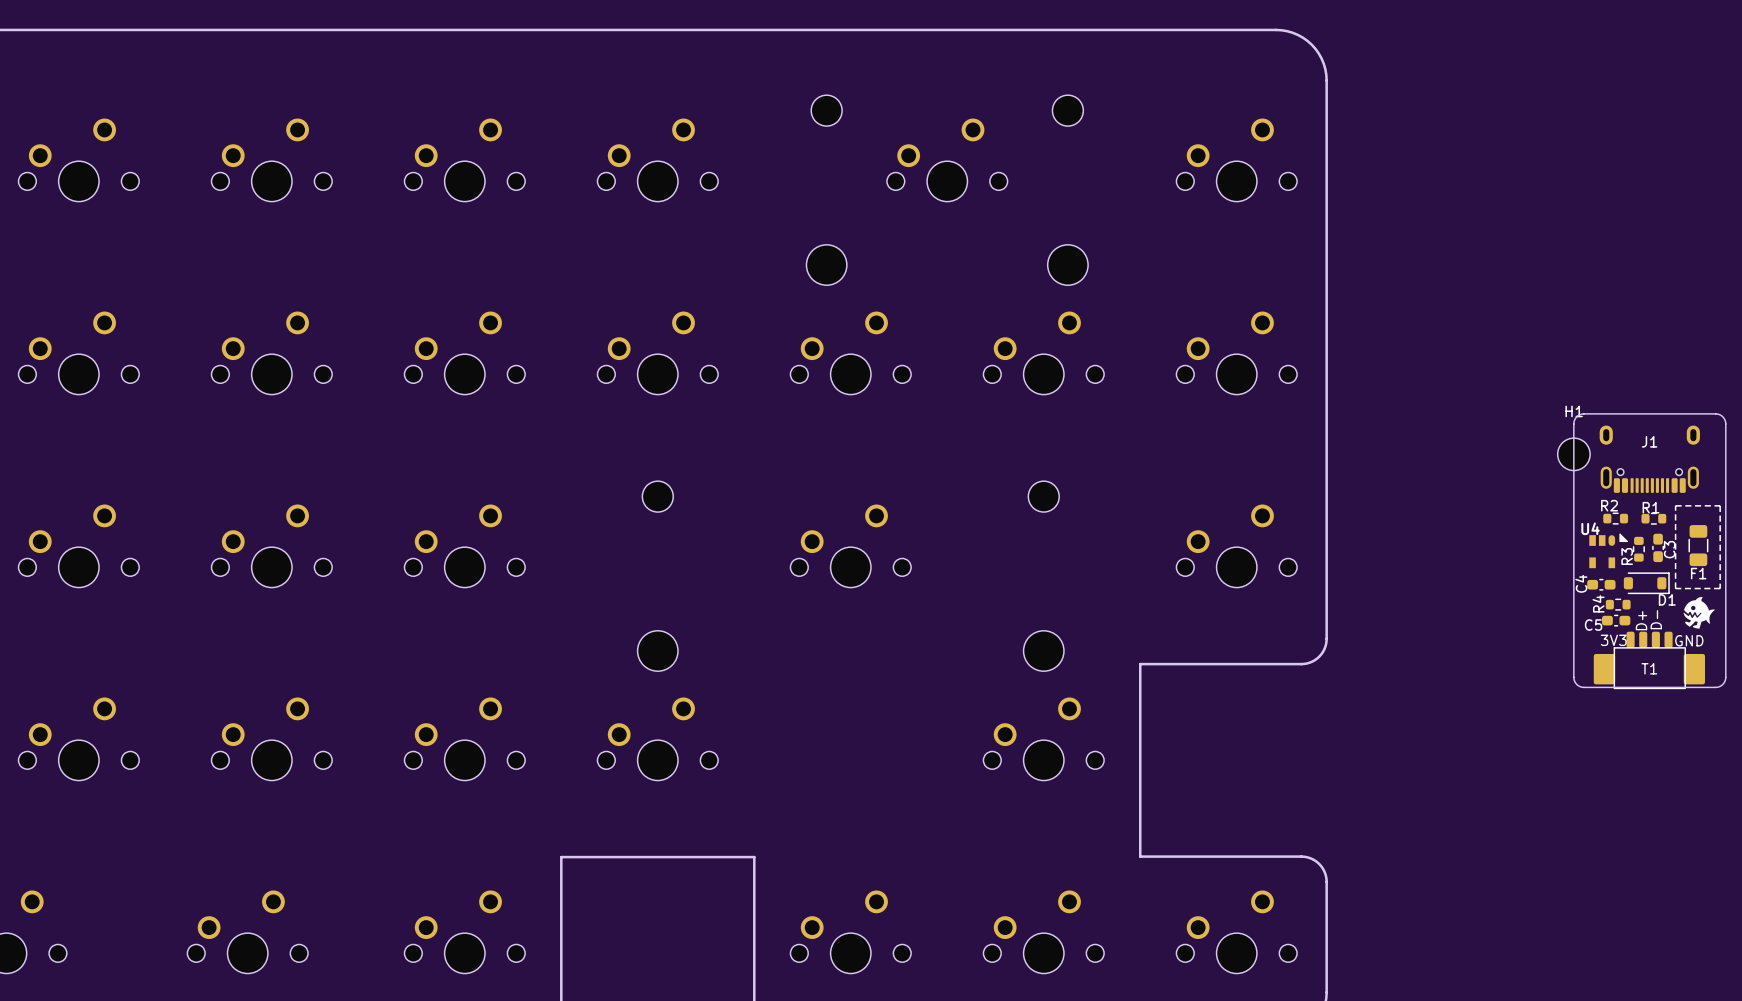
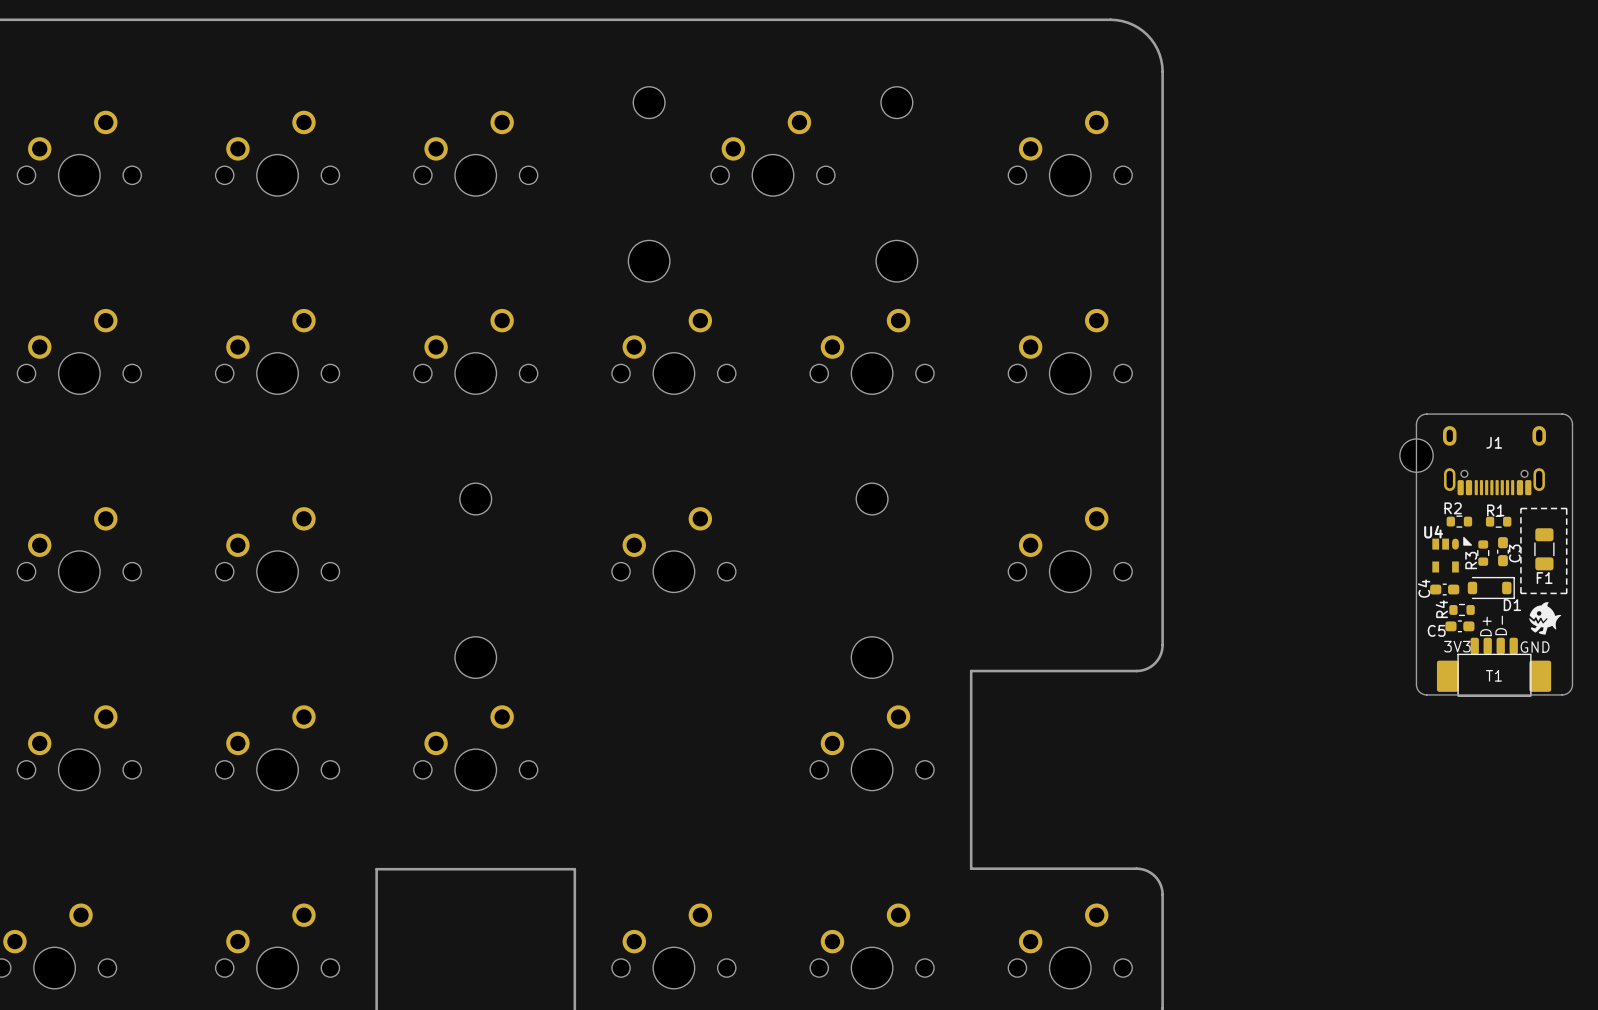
H1 name: H1 (1574, 411) -> none

